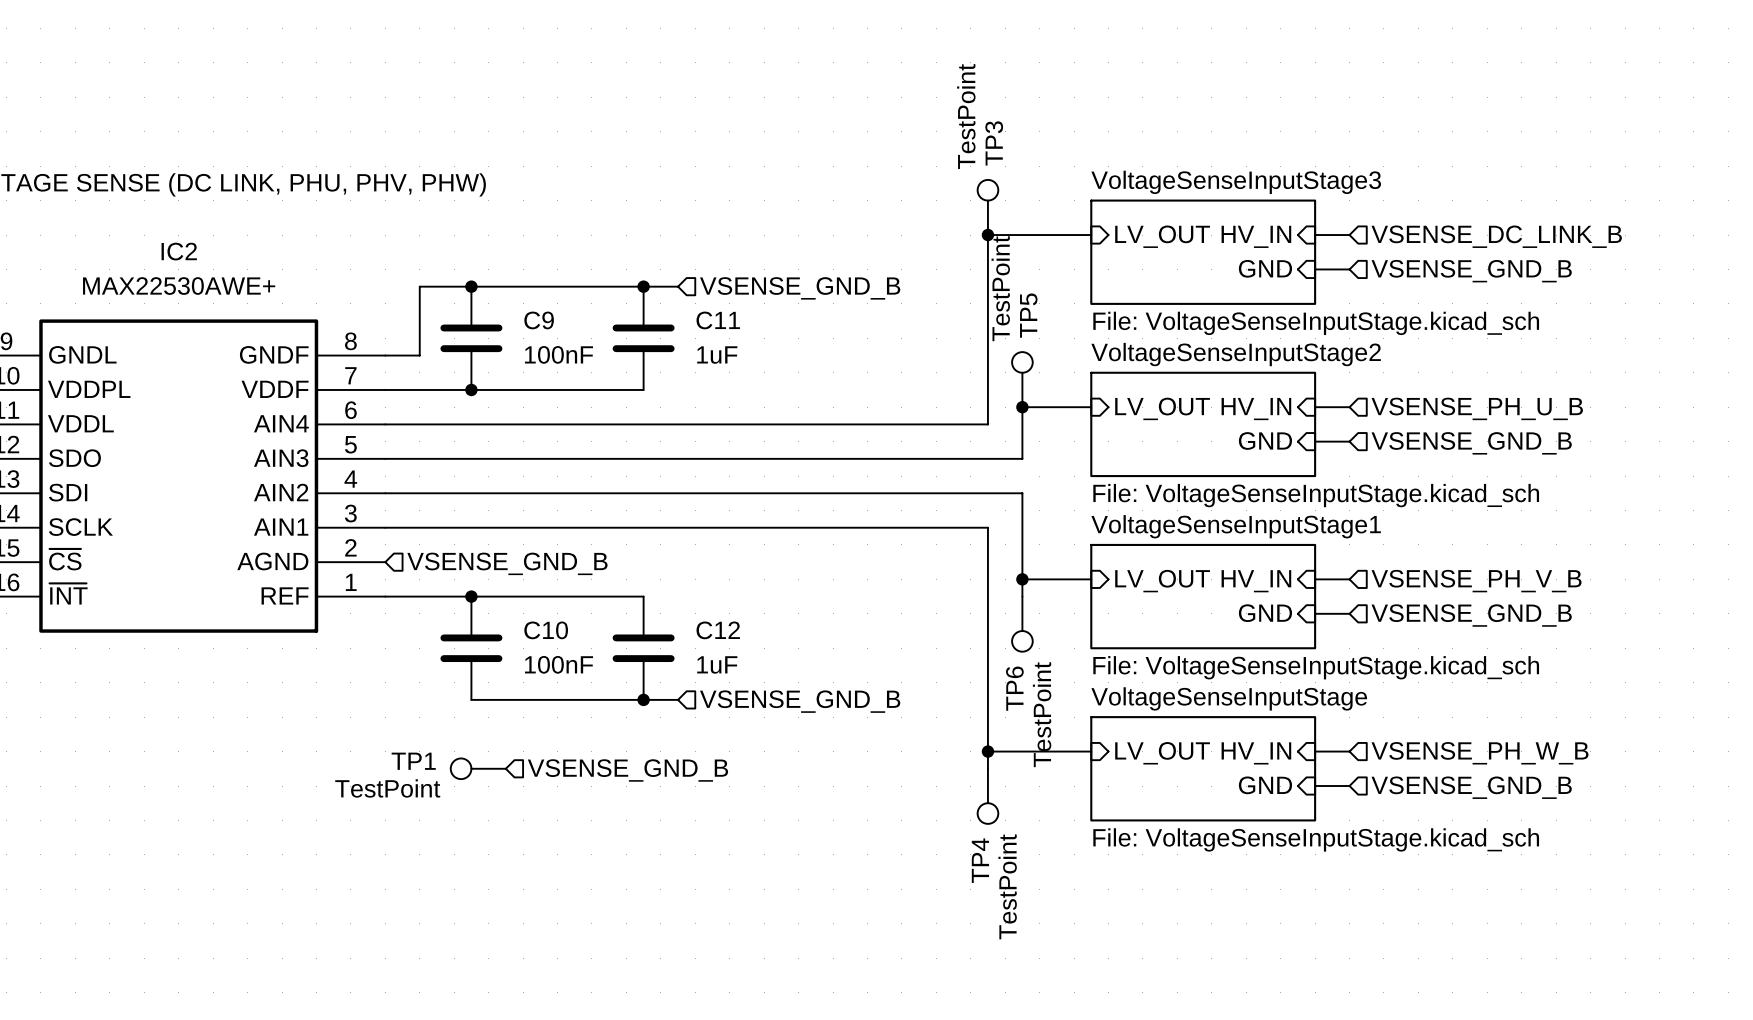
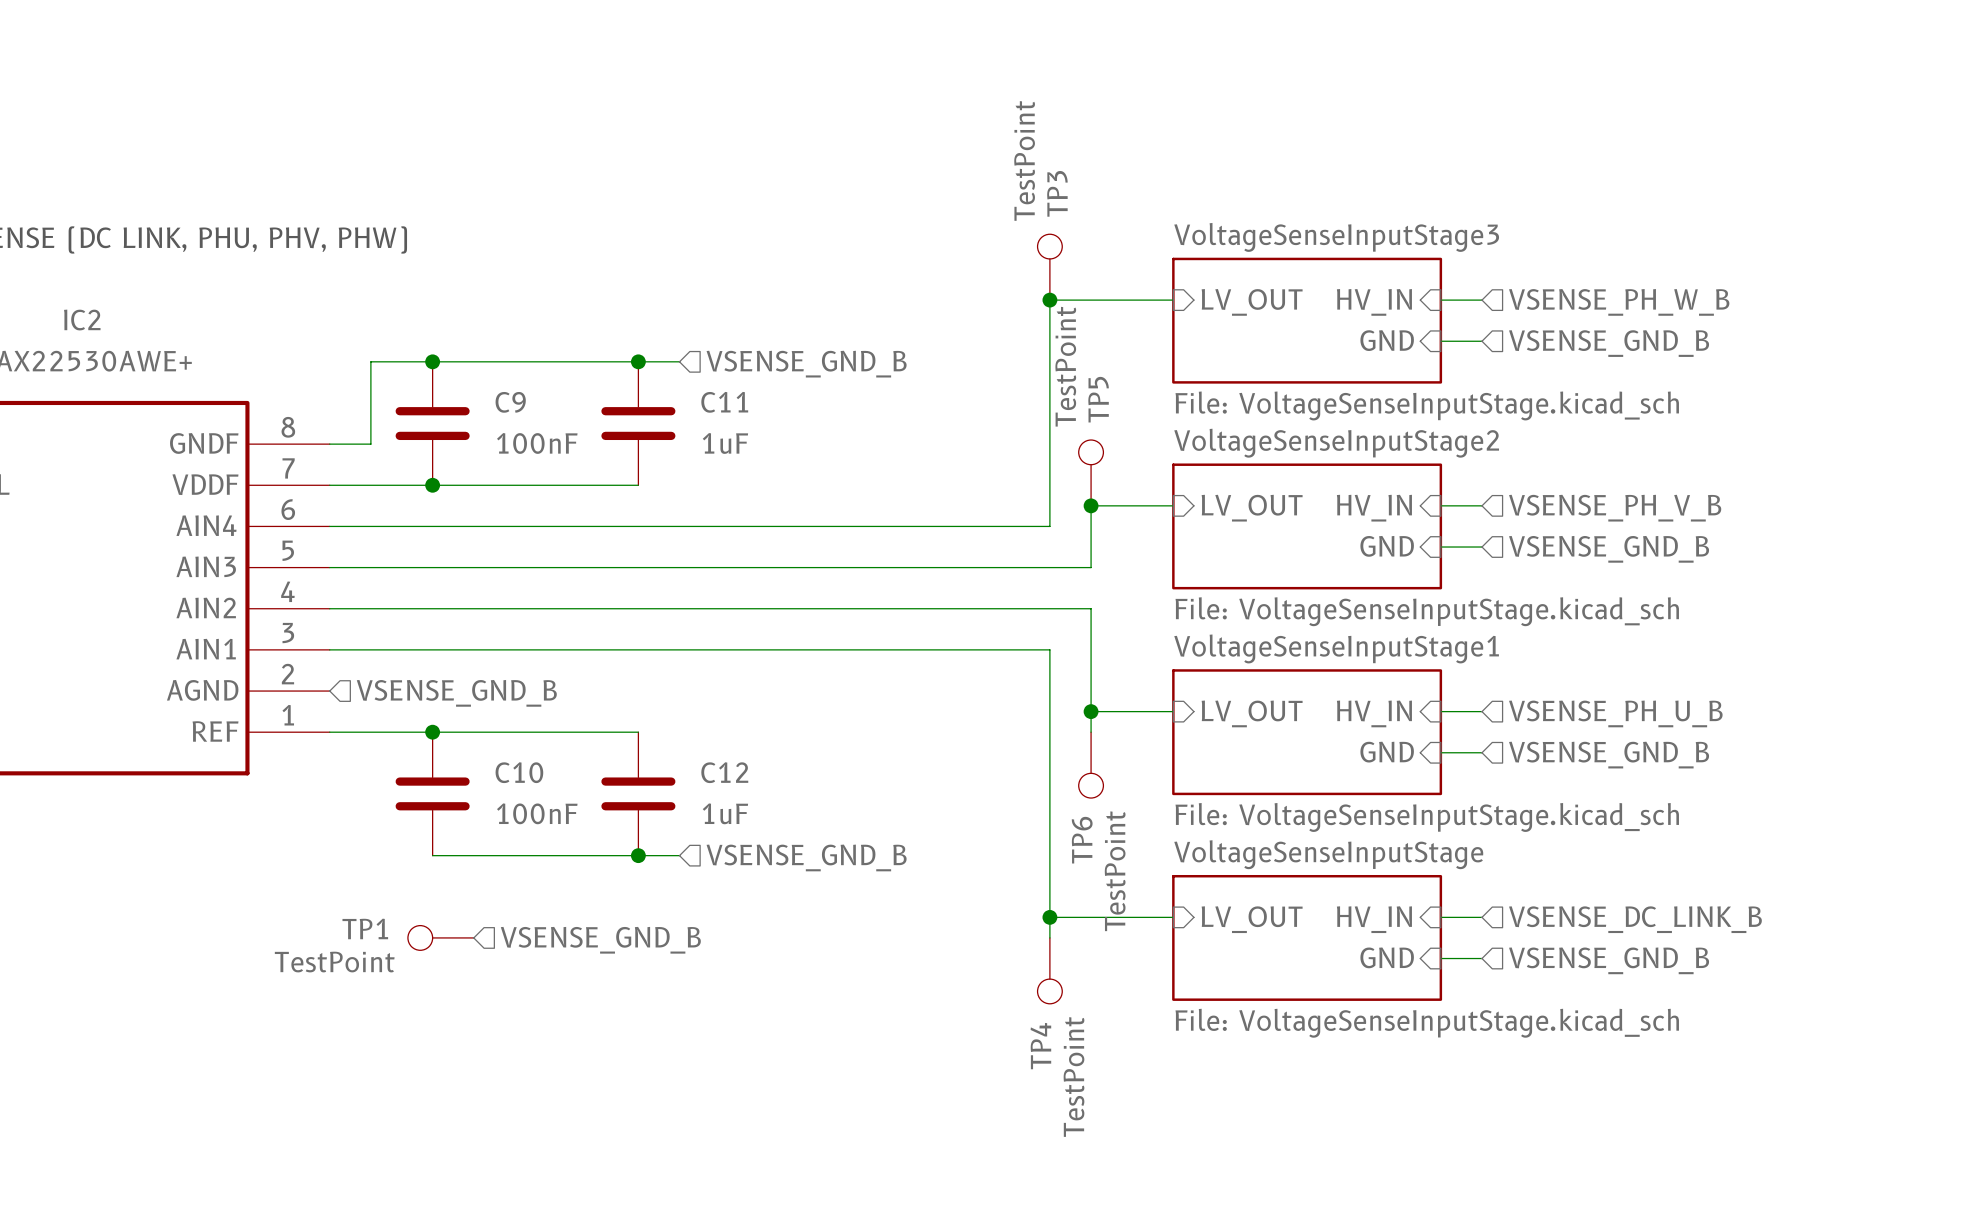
hierarchical label: VSENSE_DC_LINK_B (1496, 236) -> VSENSE_PH_W_B (1619, 302)
hierarchical label: VSENSE_PH_U_B (1477, 408) -> VSENSE_PH_V_B (1615, 508)
hierarchical label: VSENSE_PH_V_B (1476, 581) -> VSENSE_PH_U_B (1615, 713)
hierarchical label: VSENSE_PH_W_B (1480, 753) -> VSENSE_DC_LINK_B (1635, 919)

